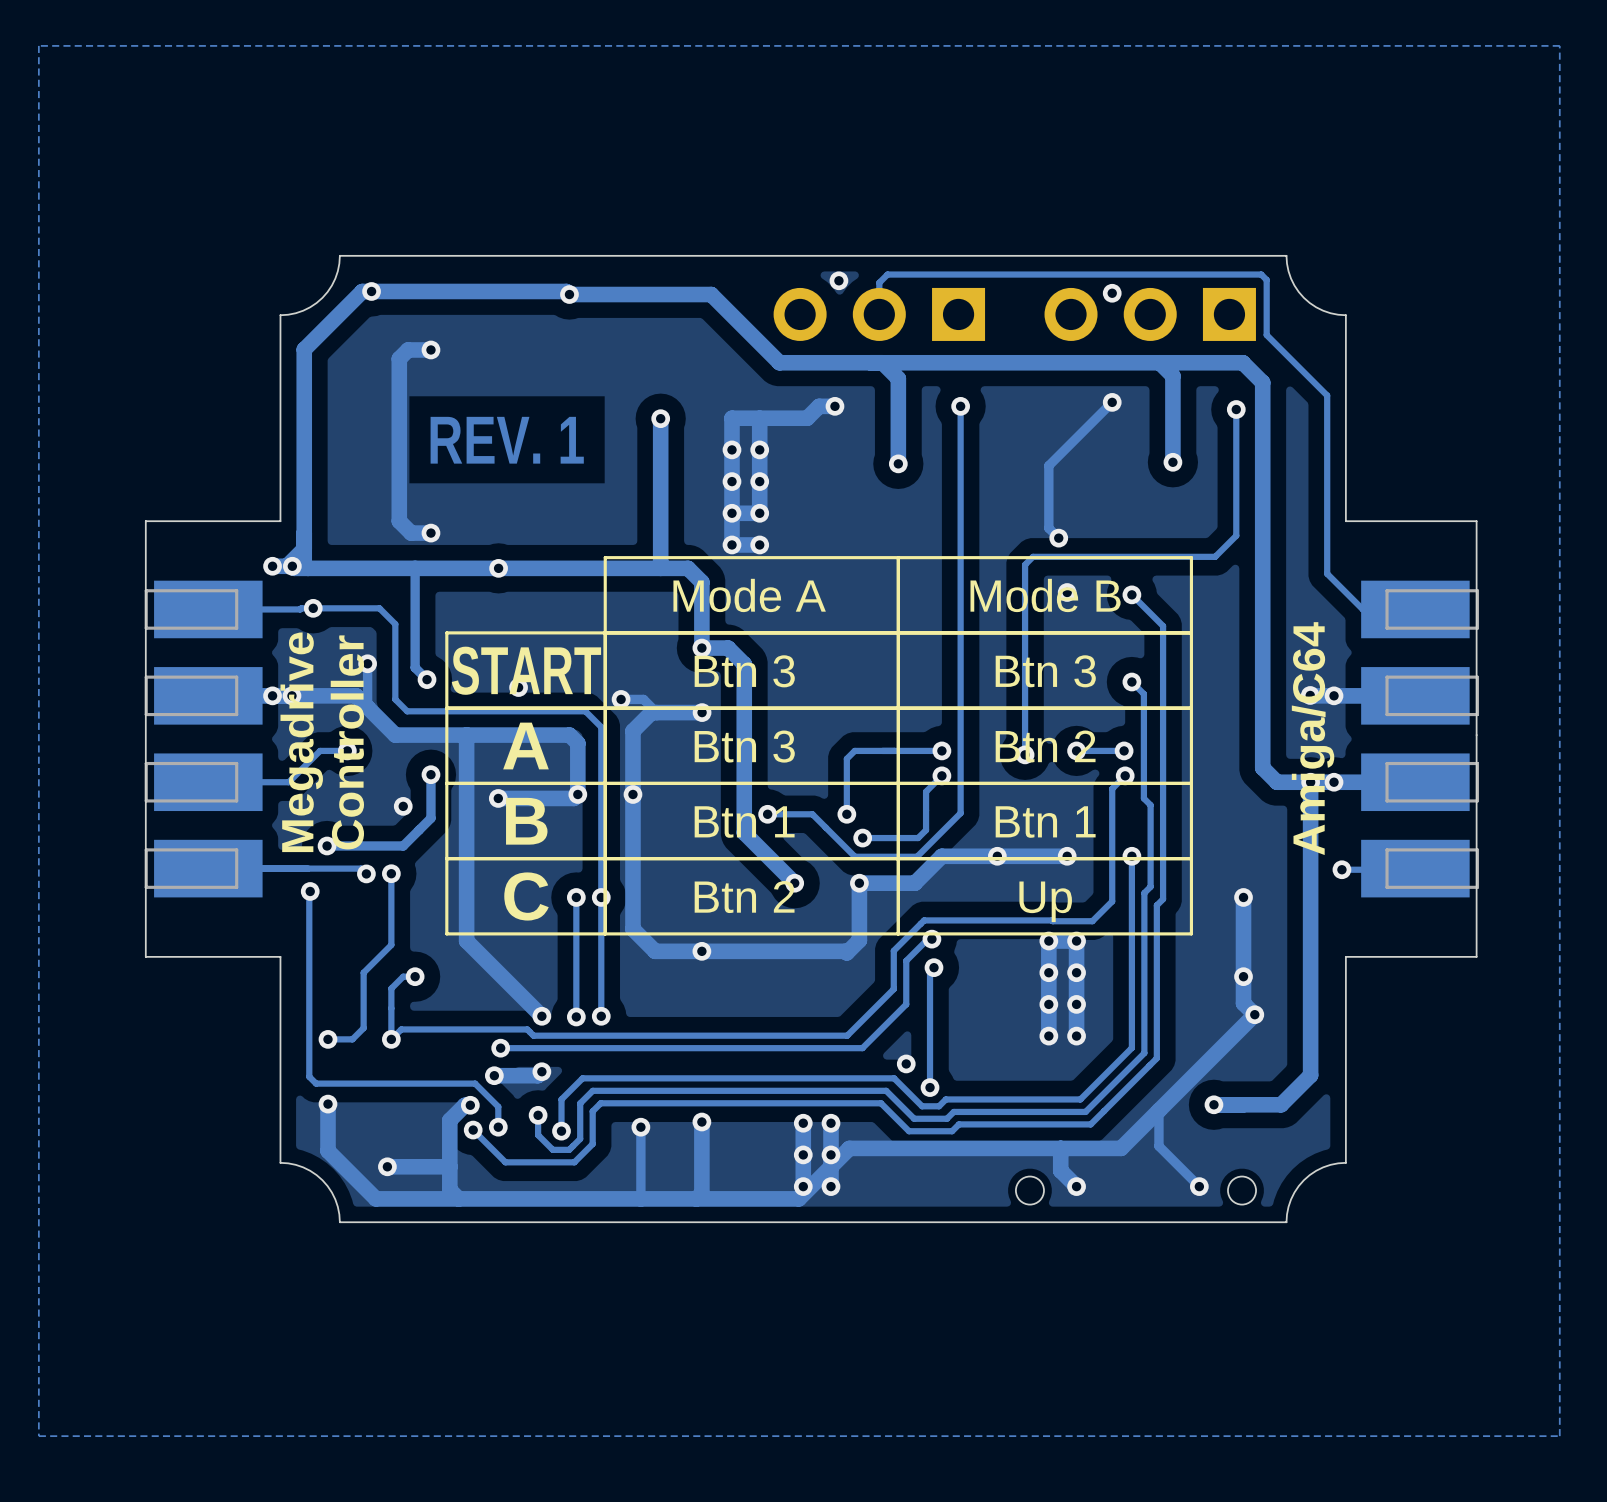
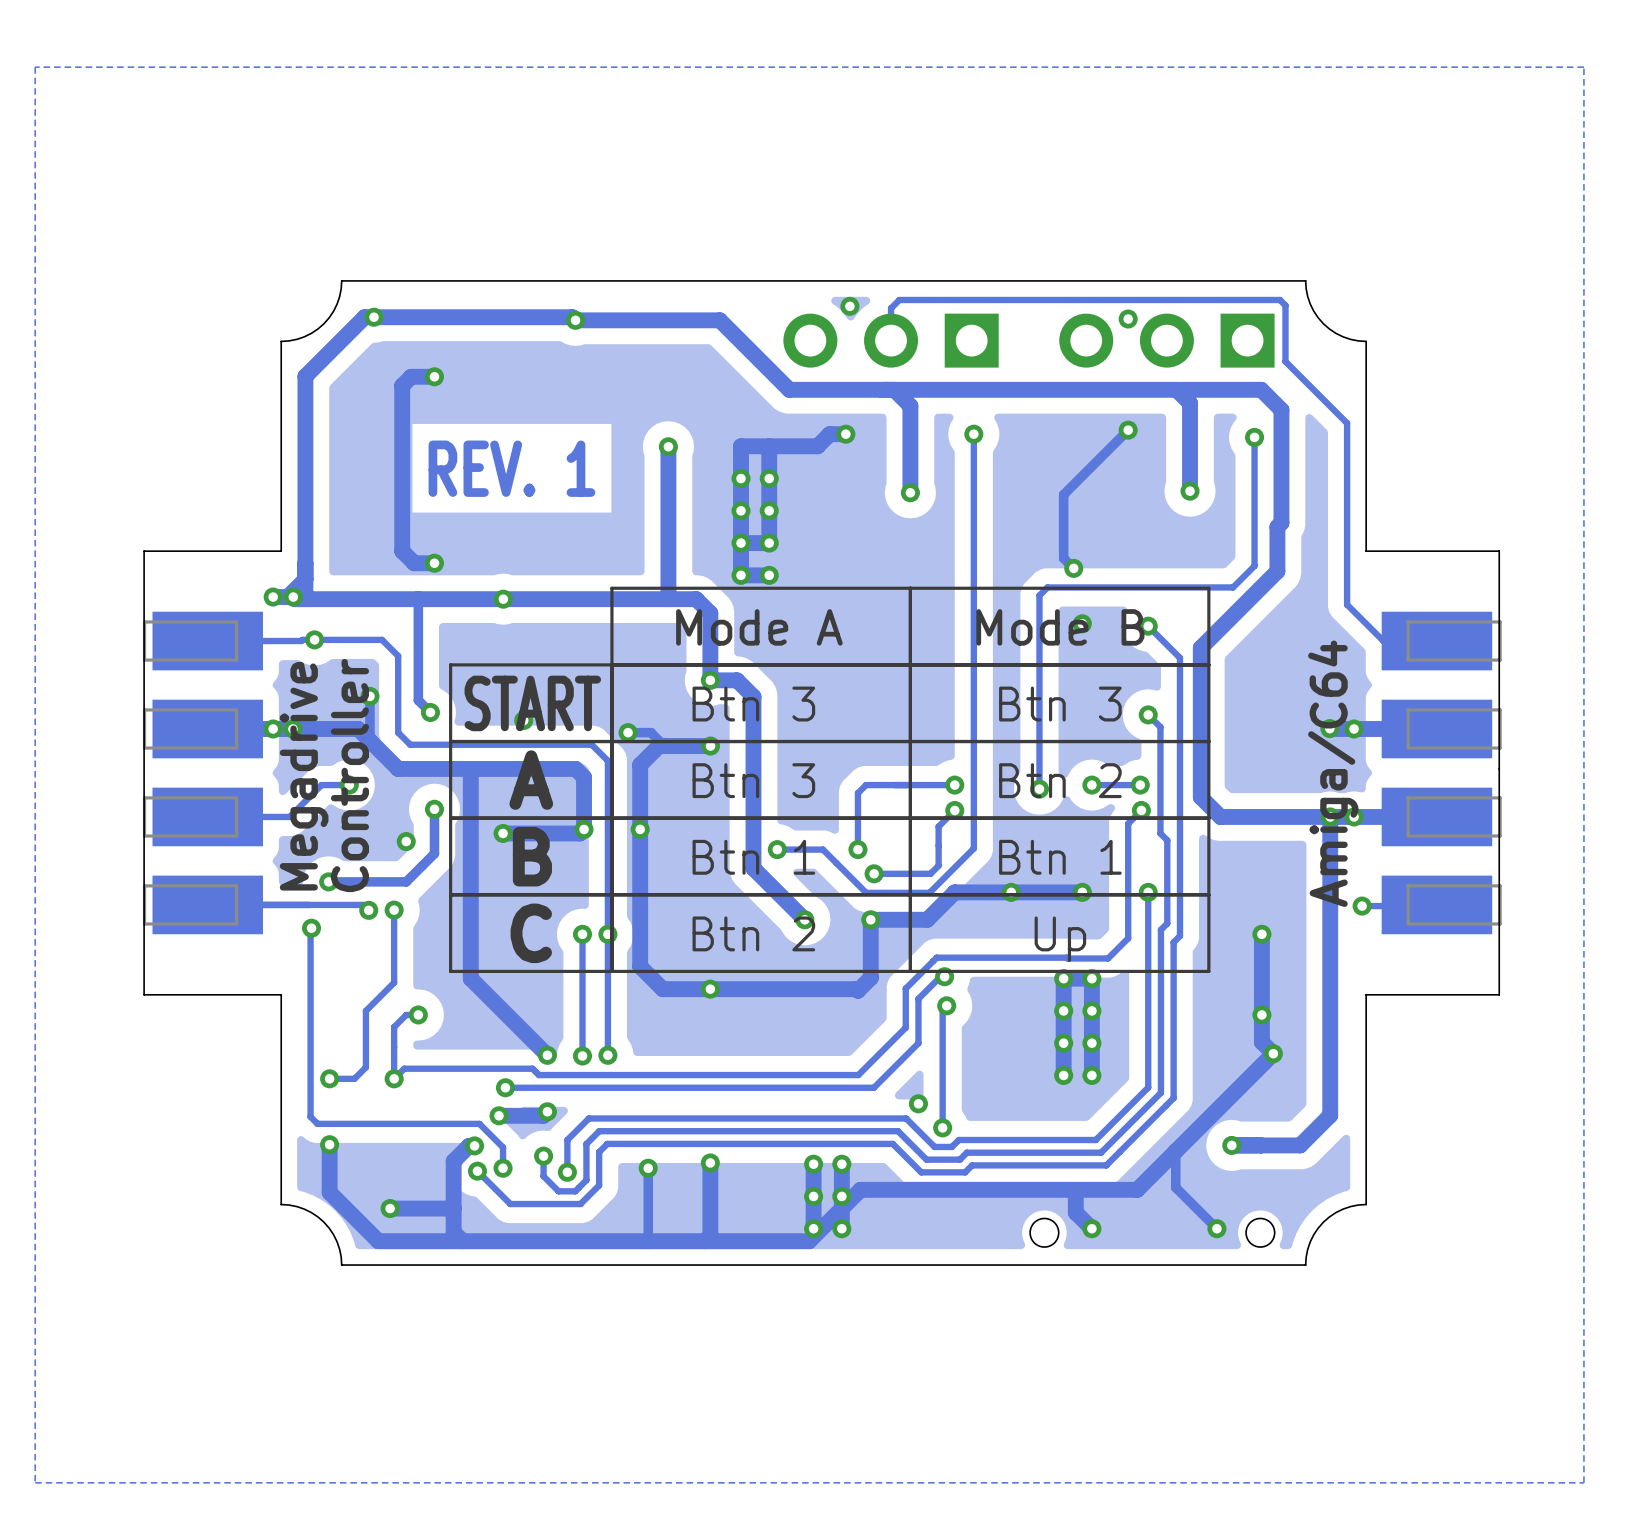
track: (1262, 493) (1262, 767) (1276, 782) -> (1281, 522) (1277, 526) (1277, 571) (1200, 647) (1200, 797) (1220, 816) (1295, 816)

